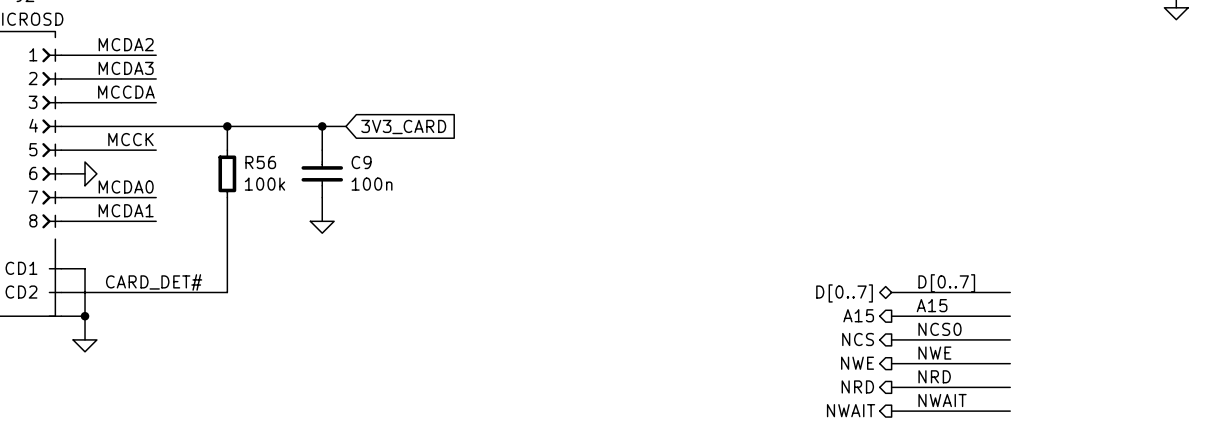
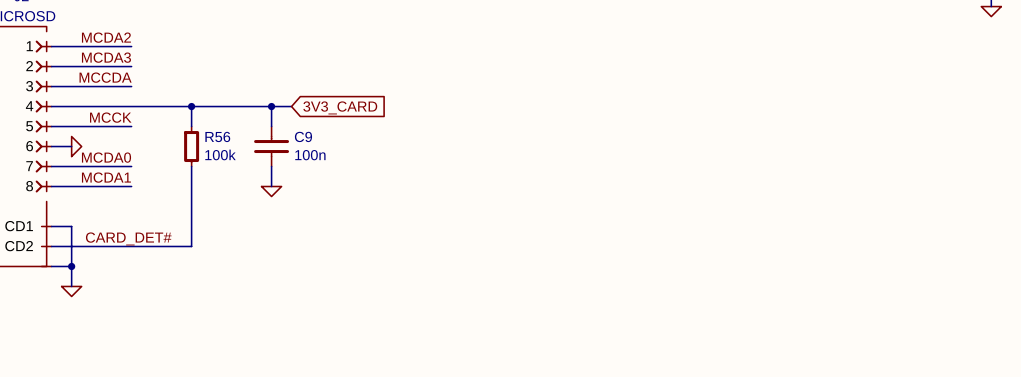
label: D[0..7] (946, 283) -> none
bus: (891, 292) (1010, 292) -> none
hierarchical label: D[0..7] (844, 293) -> none
label: A15 (932, 305) -> none
hierarchical label: A15 (858, 315) -> none
wire: (891, 316) (1010, 316) -> none
label: NCS0 (940, 329) -> none
hierarchical label: NCS (858, 339) -> none
wire: (891, 339) (1010, 339) -> none
label: NWE (934, 353) -> none
hierarchical label: NWE (857, 363) -> none
wire: (891, 363) (1010, 363) -> none
label: NRD (934, 376) -> none
hierarchical label: NRD (857, 386) -> none
wire: (891, 387) (1010, 387) -> none
label: NWAIT (942, 400) -> none
hierarchical label: NWAIT (851, 410) -> none
wire: (891, 411) (1010, 411) -> none

